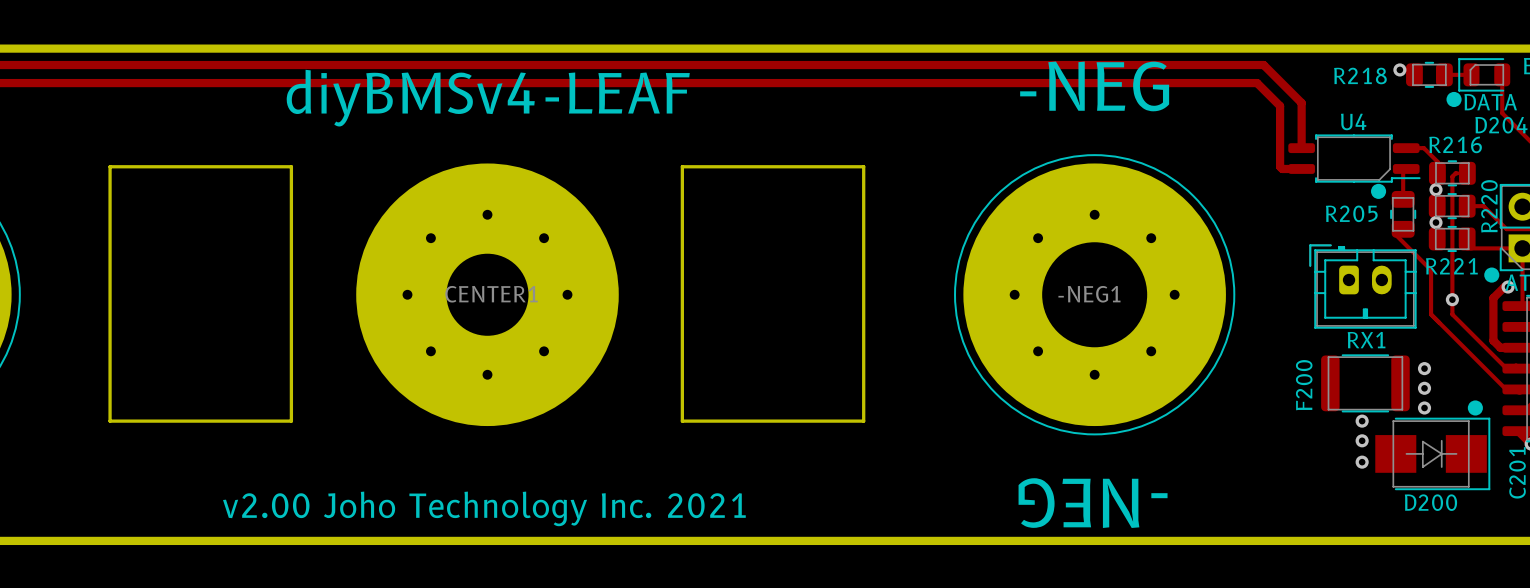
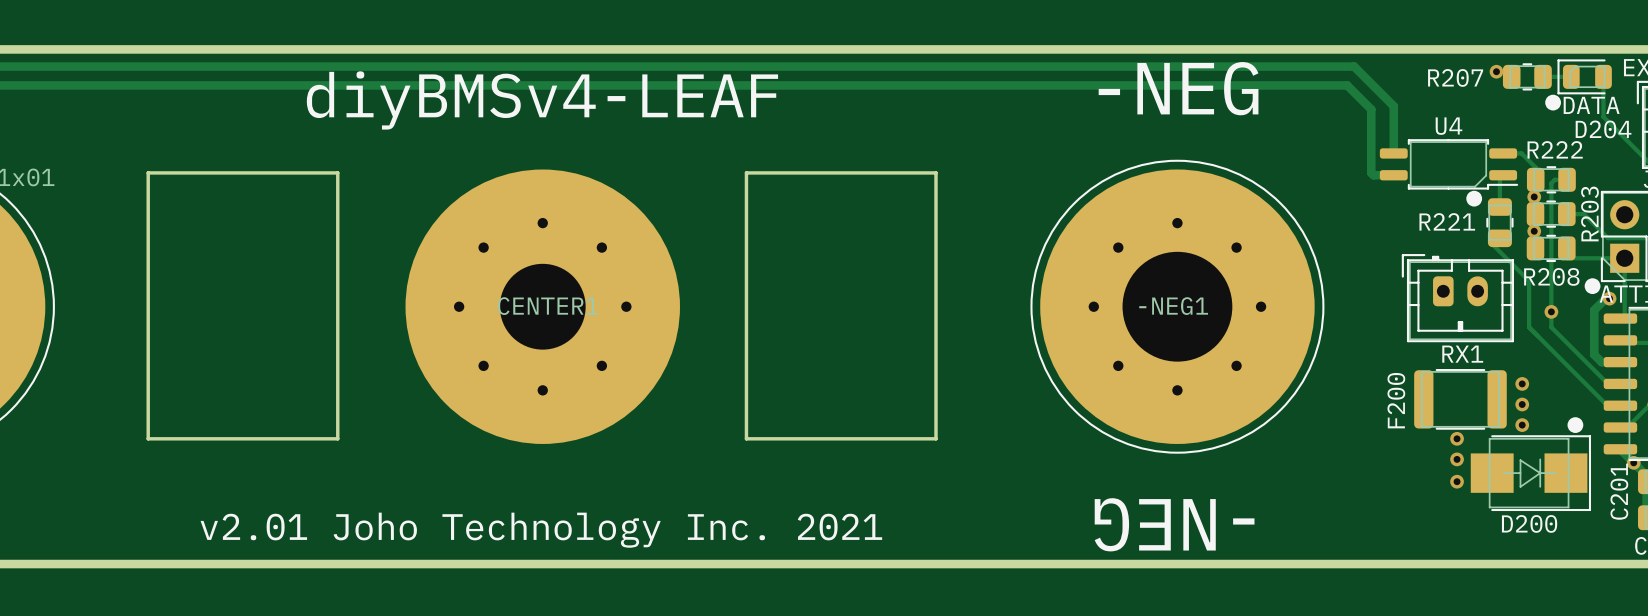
R218 name: R218 (1360, 75) -> R207 (1455, 77)
R216 name: R216 (1455, 144) -> R222 (1555, 149)
R220 name: R220 (1489, 206) -> R203 (1589, 214)
R205 name: R205 (1351, 213) -> R221 (1447, 221)
R221 name: R221 (1451, 266) -> R208 (1551, 276)
text: v2.00 Joho Technology Inc. 2021 (484, 508) -> v2.01 Joho Technology Inc. 2021 (541, 530)

